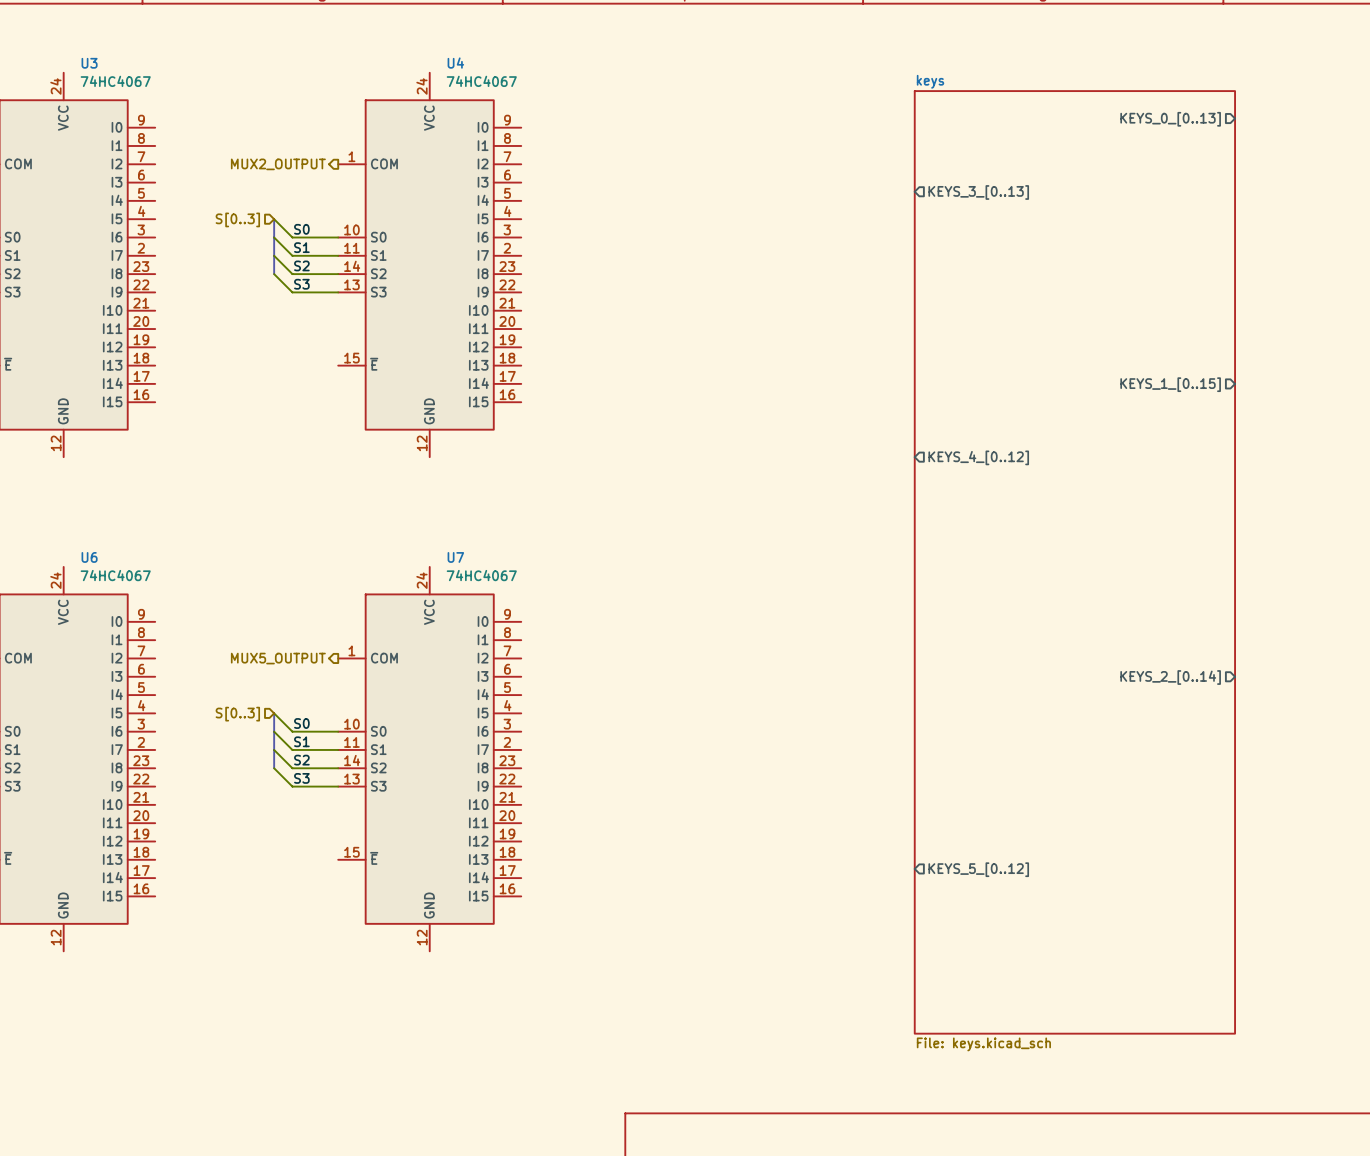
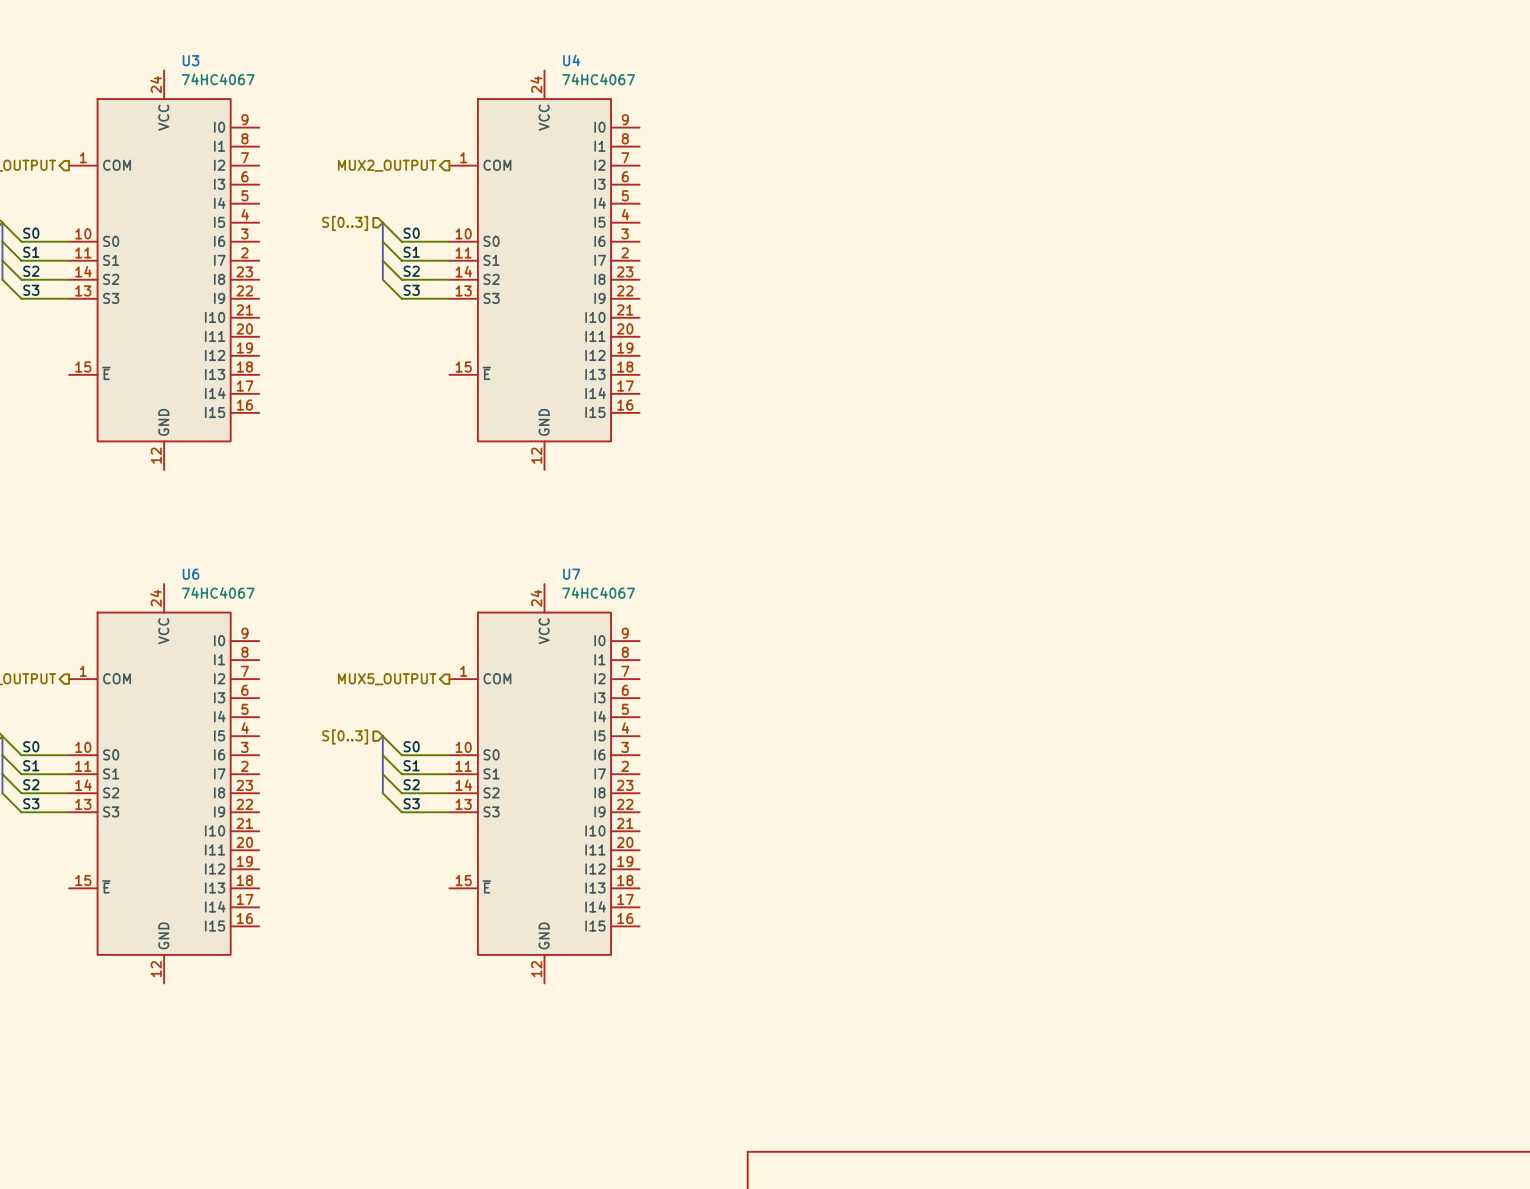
sheet pin: KEYS_0_[0..13] (1170, 119) -> none
sheet pin: KEYS_3_[0..13] (978, 192) -> none
sheet pin: KEYS_1_[0..15] (1170, 384) -> none
sheet pin: KEYS_4_[0..12] (978, 457) -> none
sheet keys: File: keys.kicad_sch (1074, 562) -> none
sheet pin: KEYS_2_[0..14] (1170, 677) -> none
sheet pin: KEYS_5_[0..12] (978, 869) -> none

